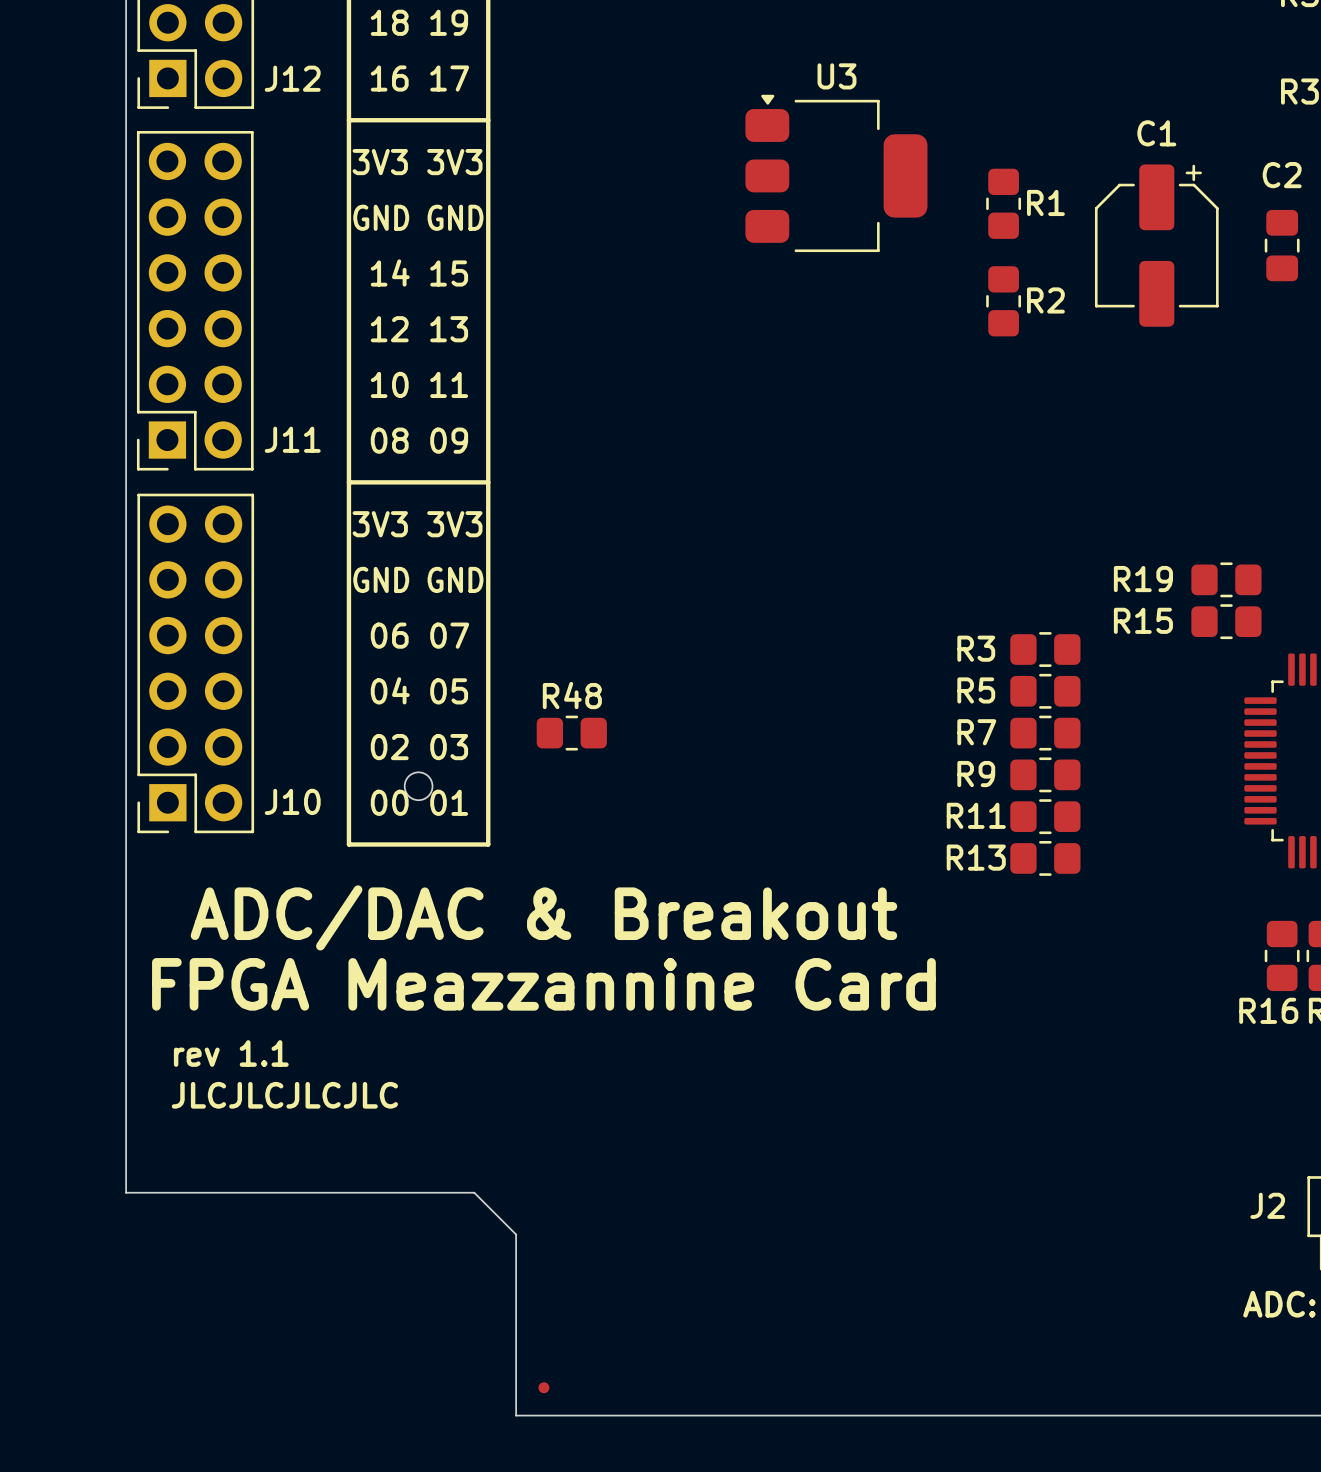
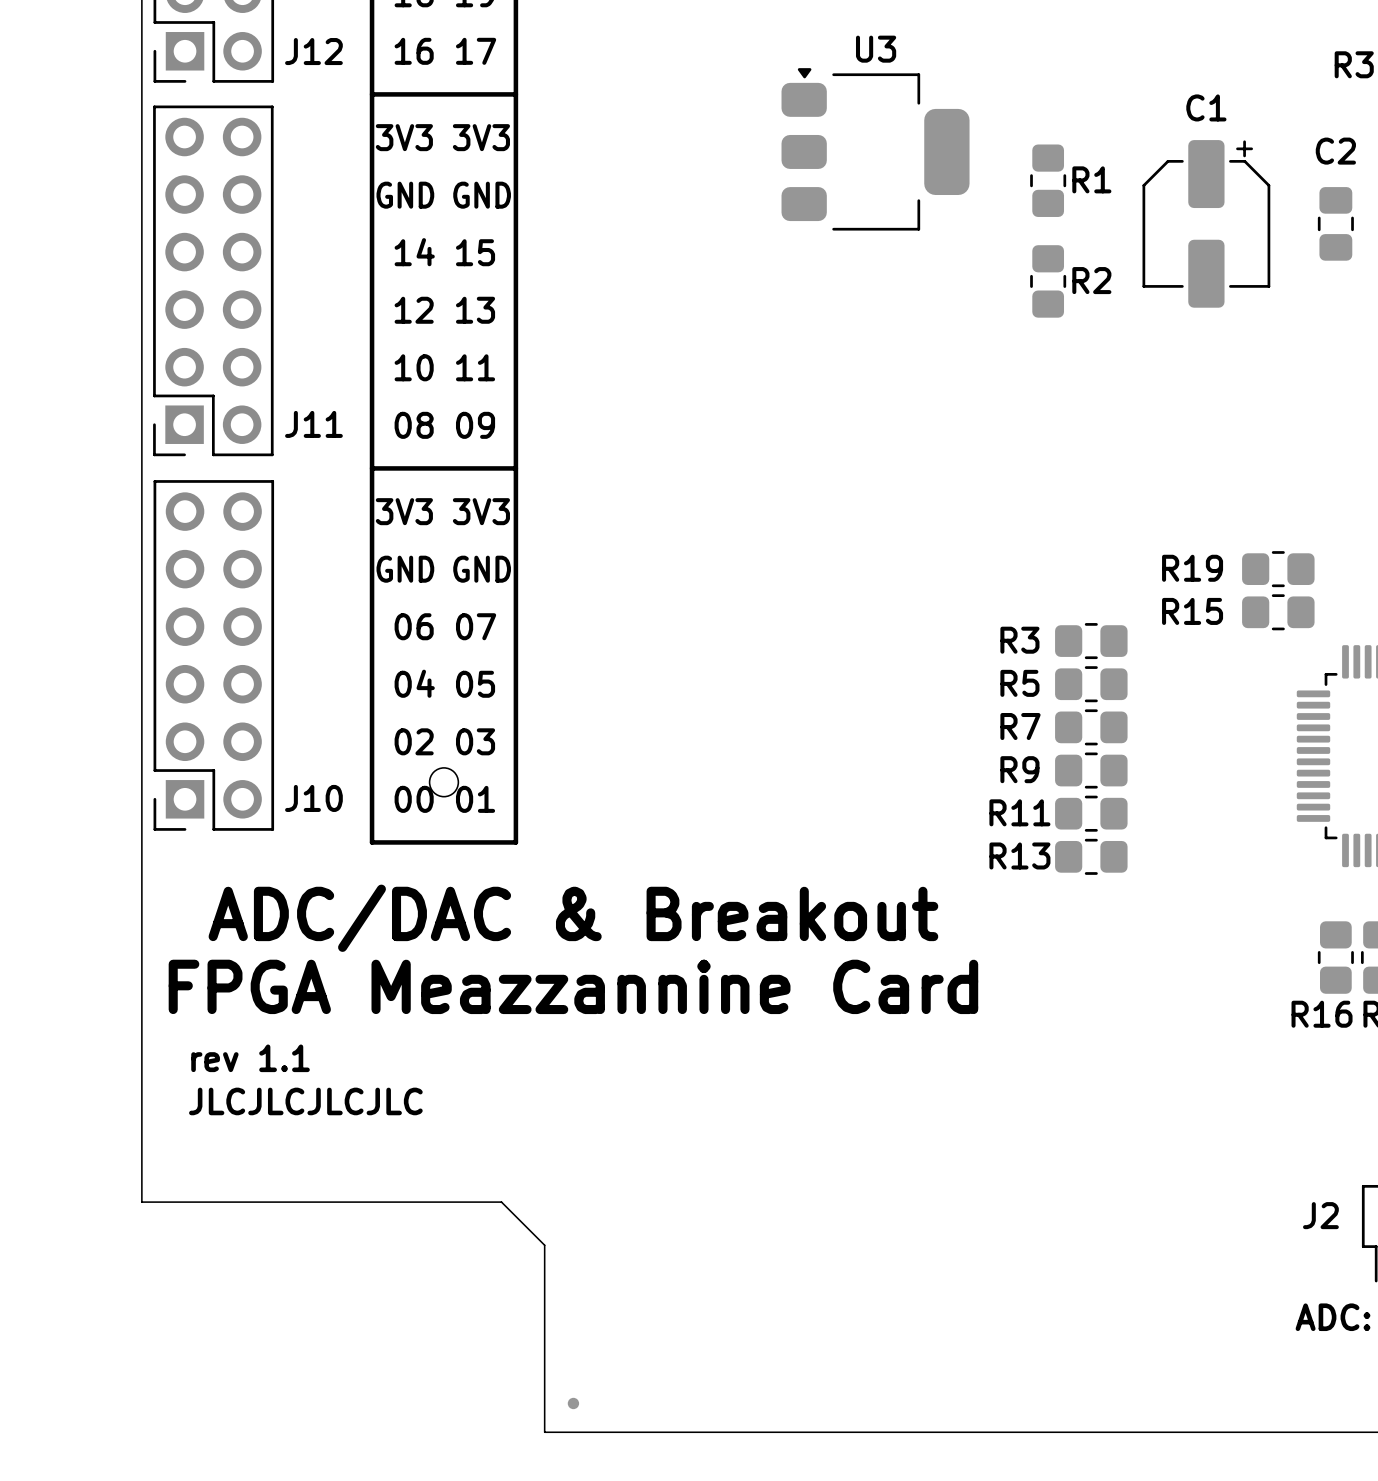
R48: (571, 733) -> none

